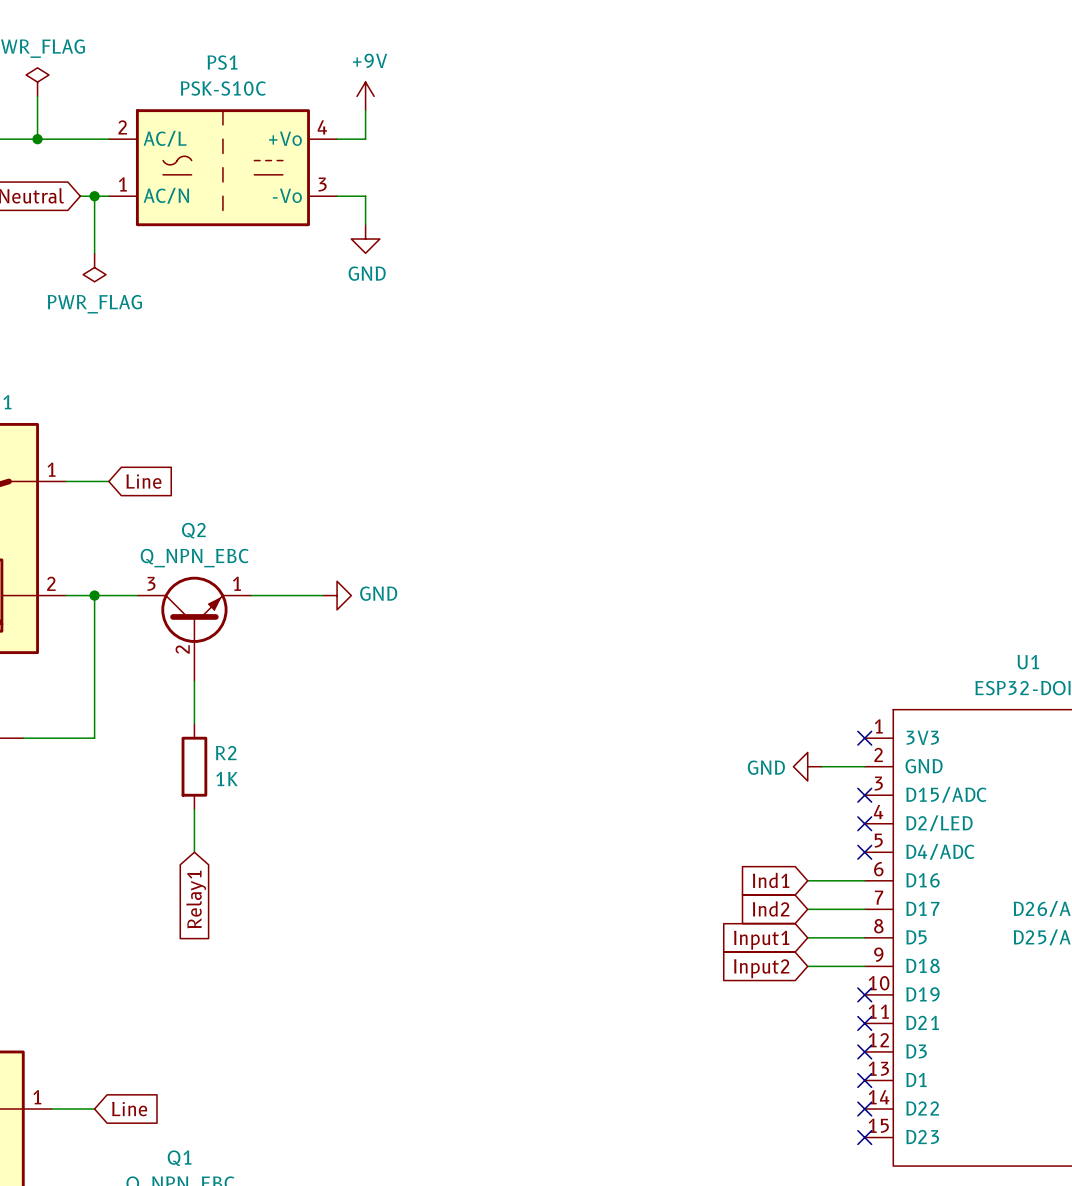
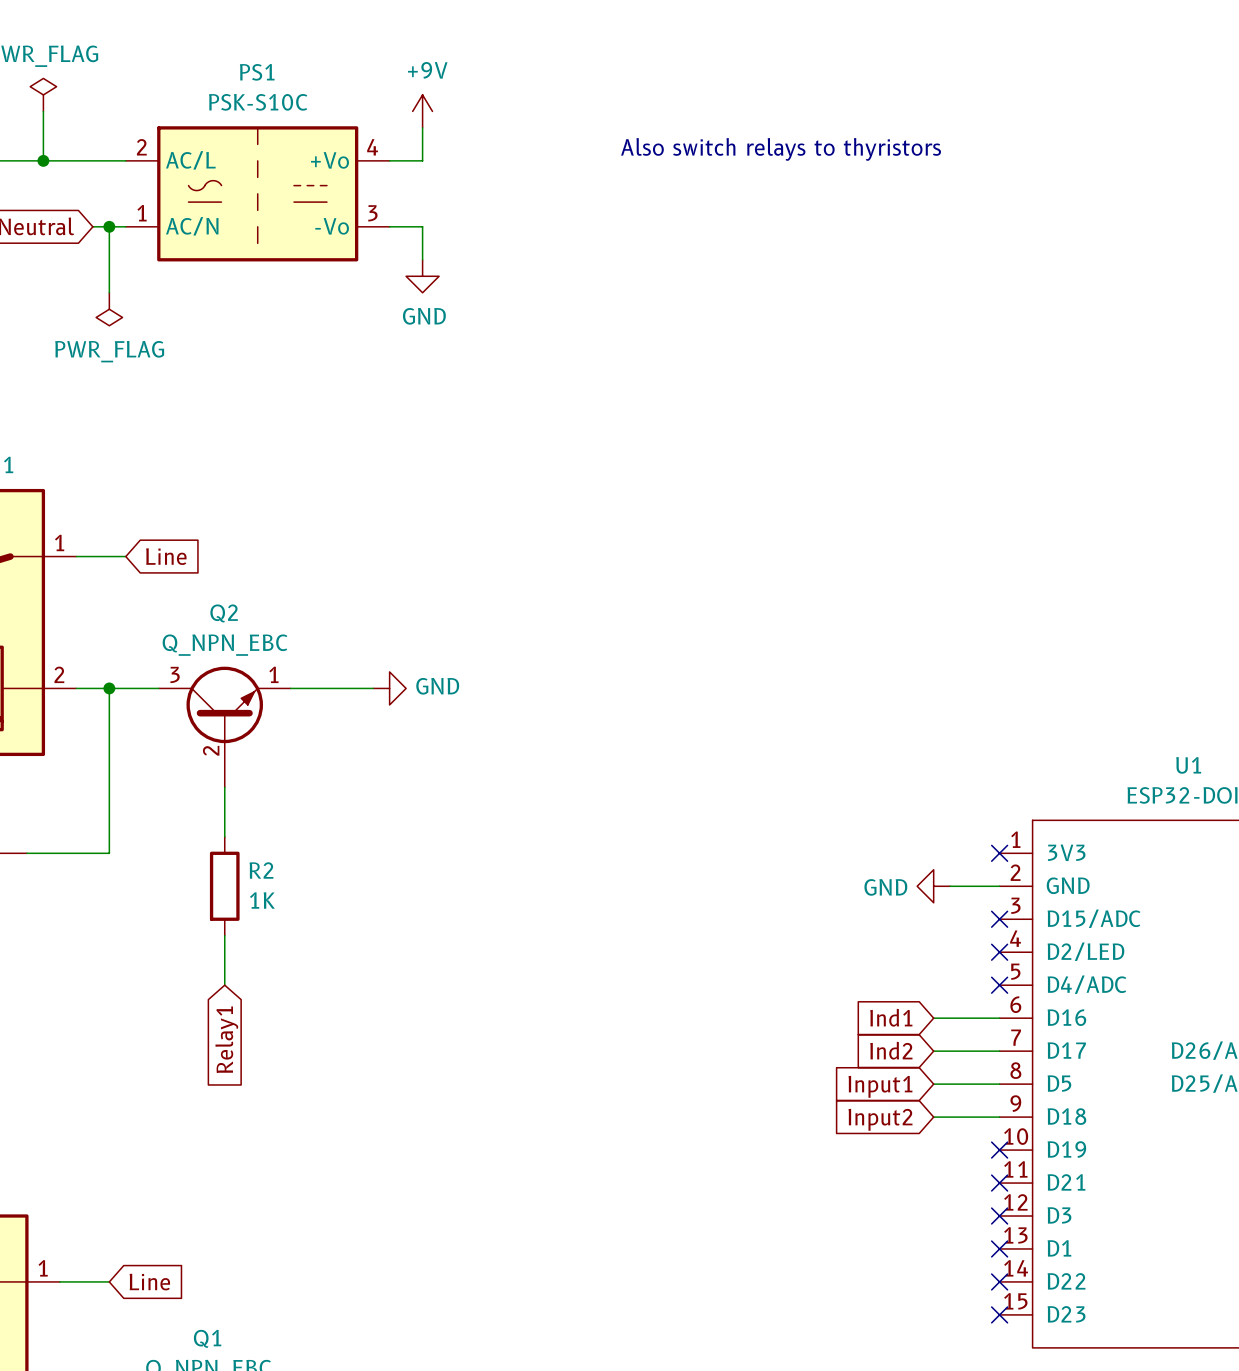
text: none -> Also switch relays to thyristors (781, 149)

